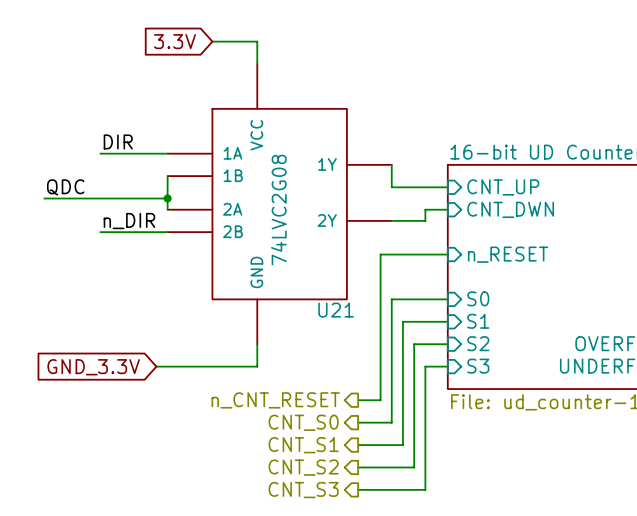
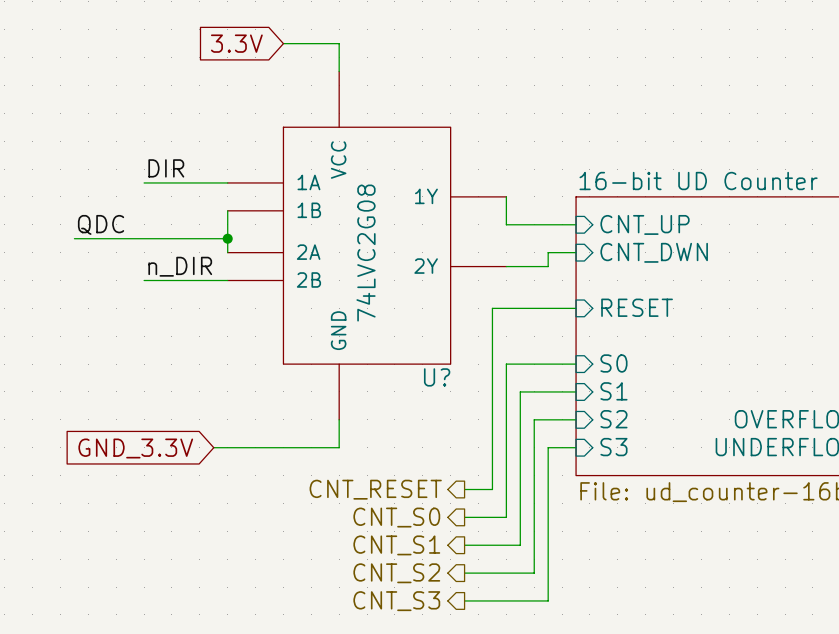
sheet pin: n_RESET (508, 254) -> RESET (637, 307)
U21 name: U21 (336, 310) -> U? (437, 377)
hierarchical label: n_CNT_RESET (275, 400) -> CNT_RESET (375, 489)

